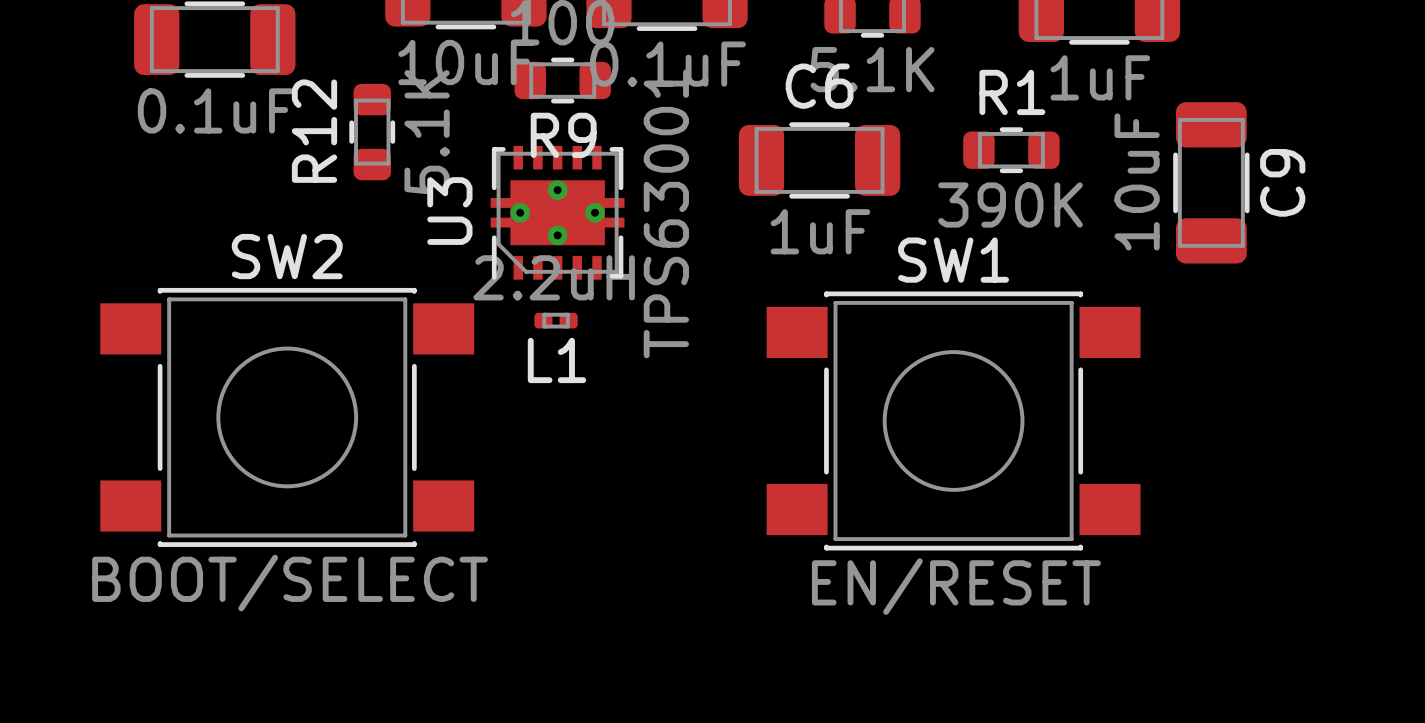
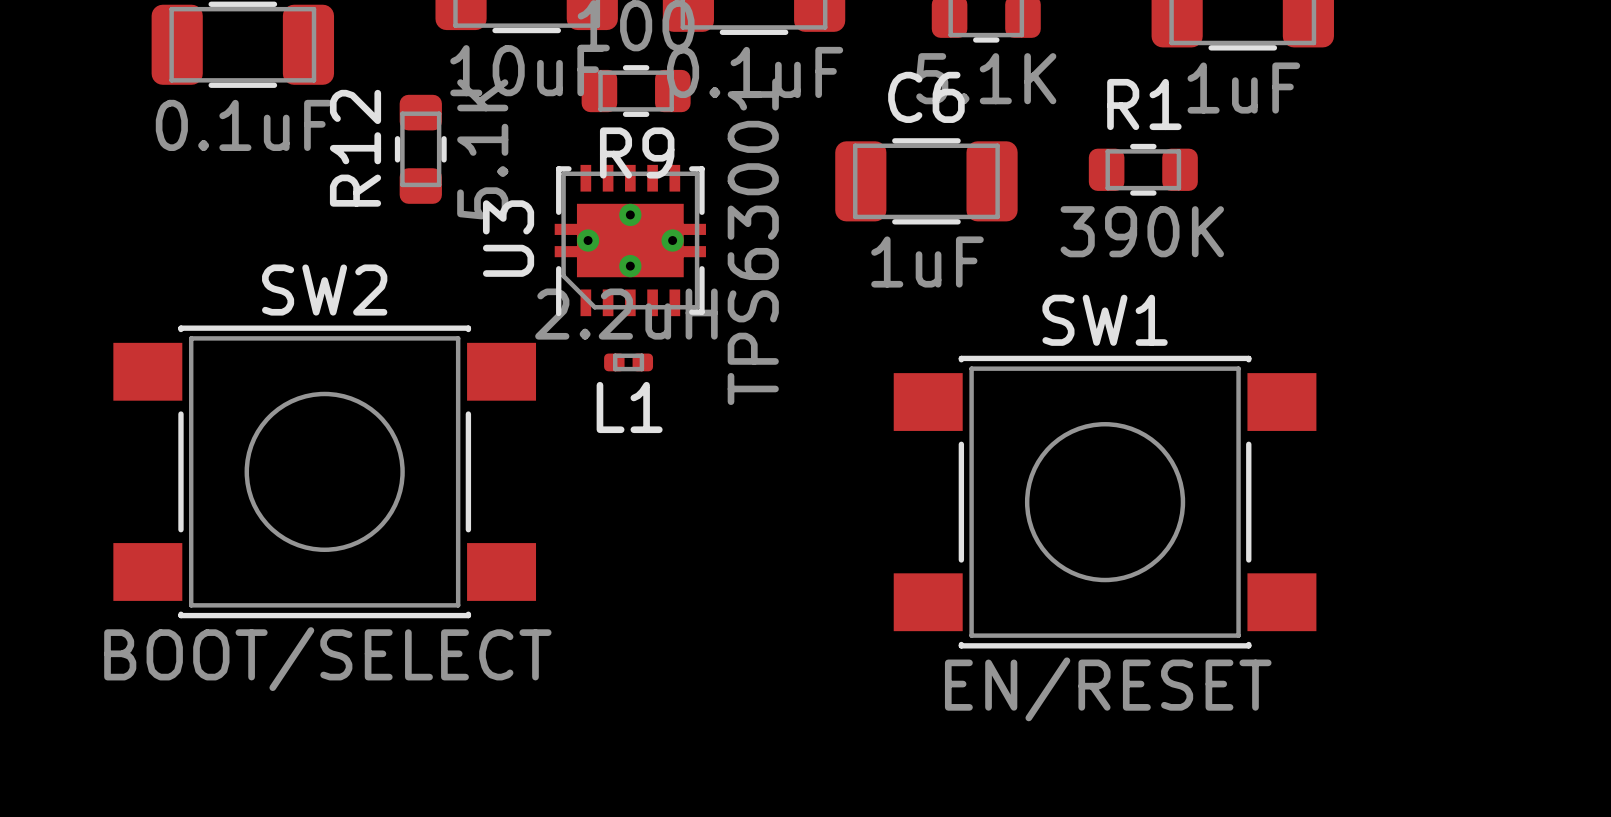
C9: 10uF (1211, 182) -> none
SW1 position: (953, 420) -> (1105, 502)

